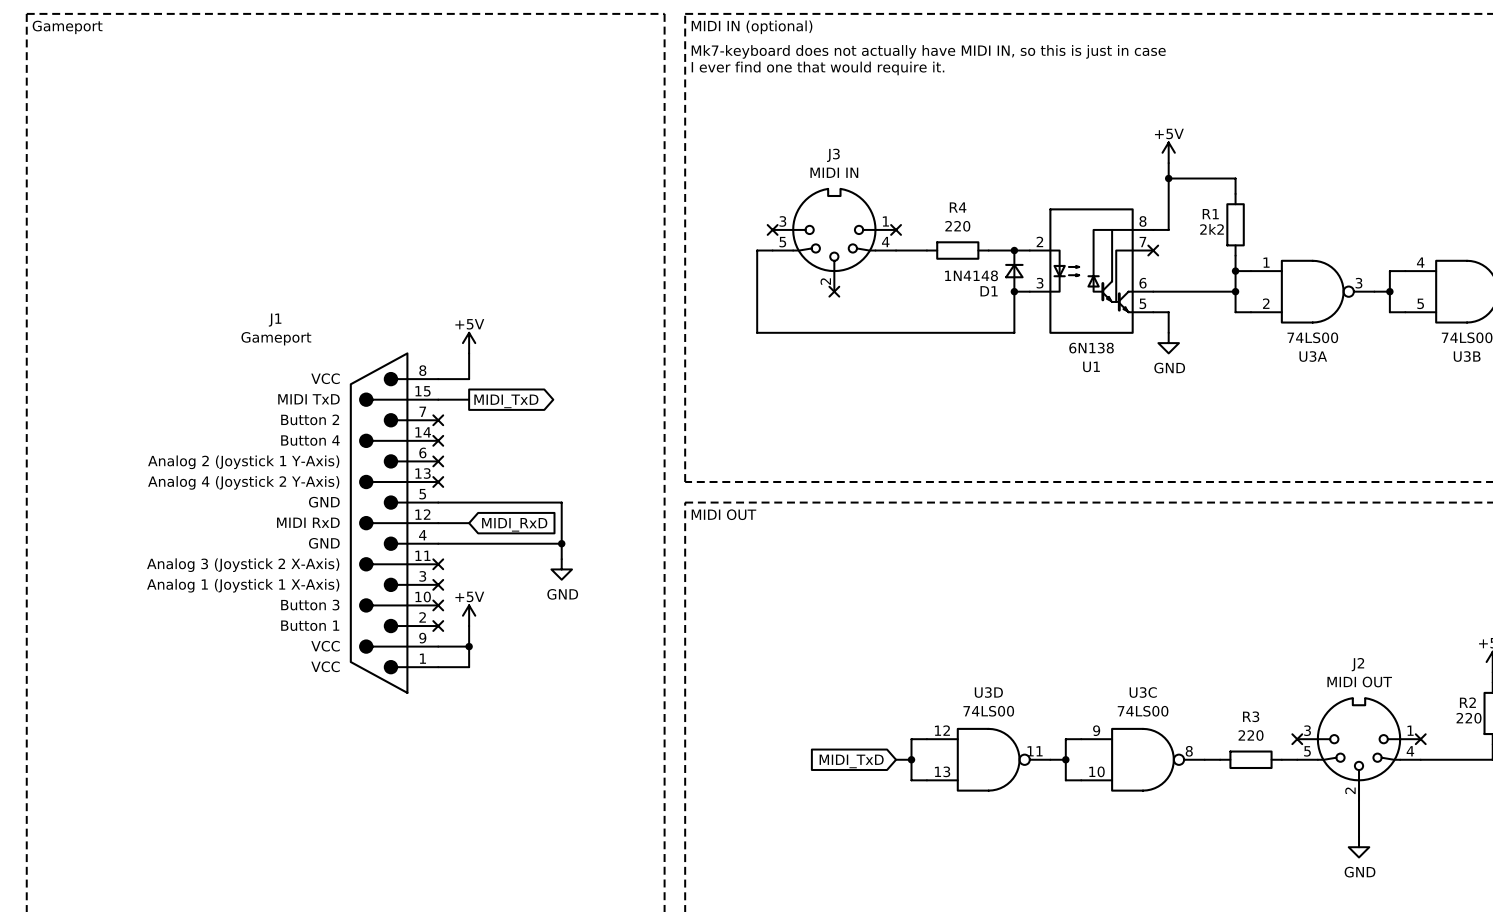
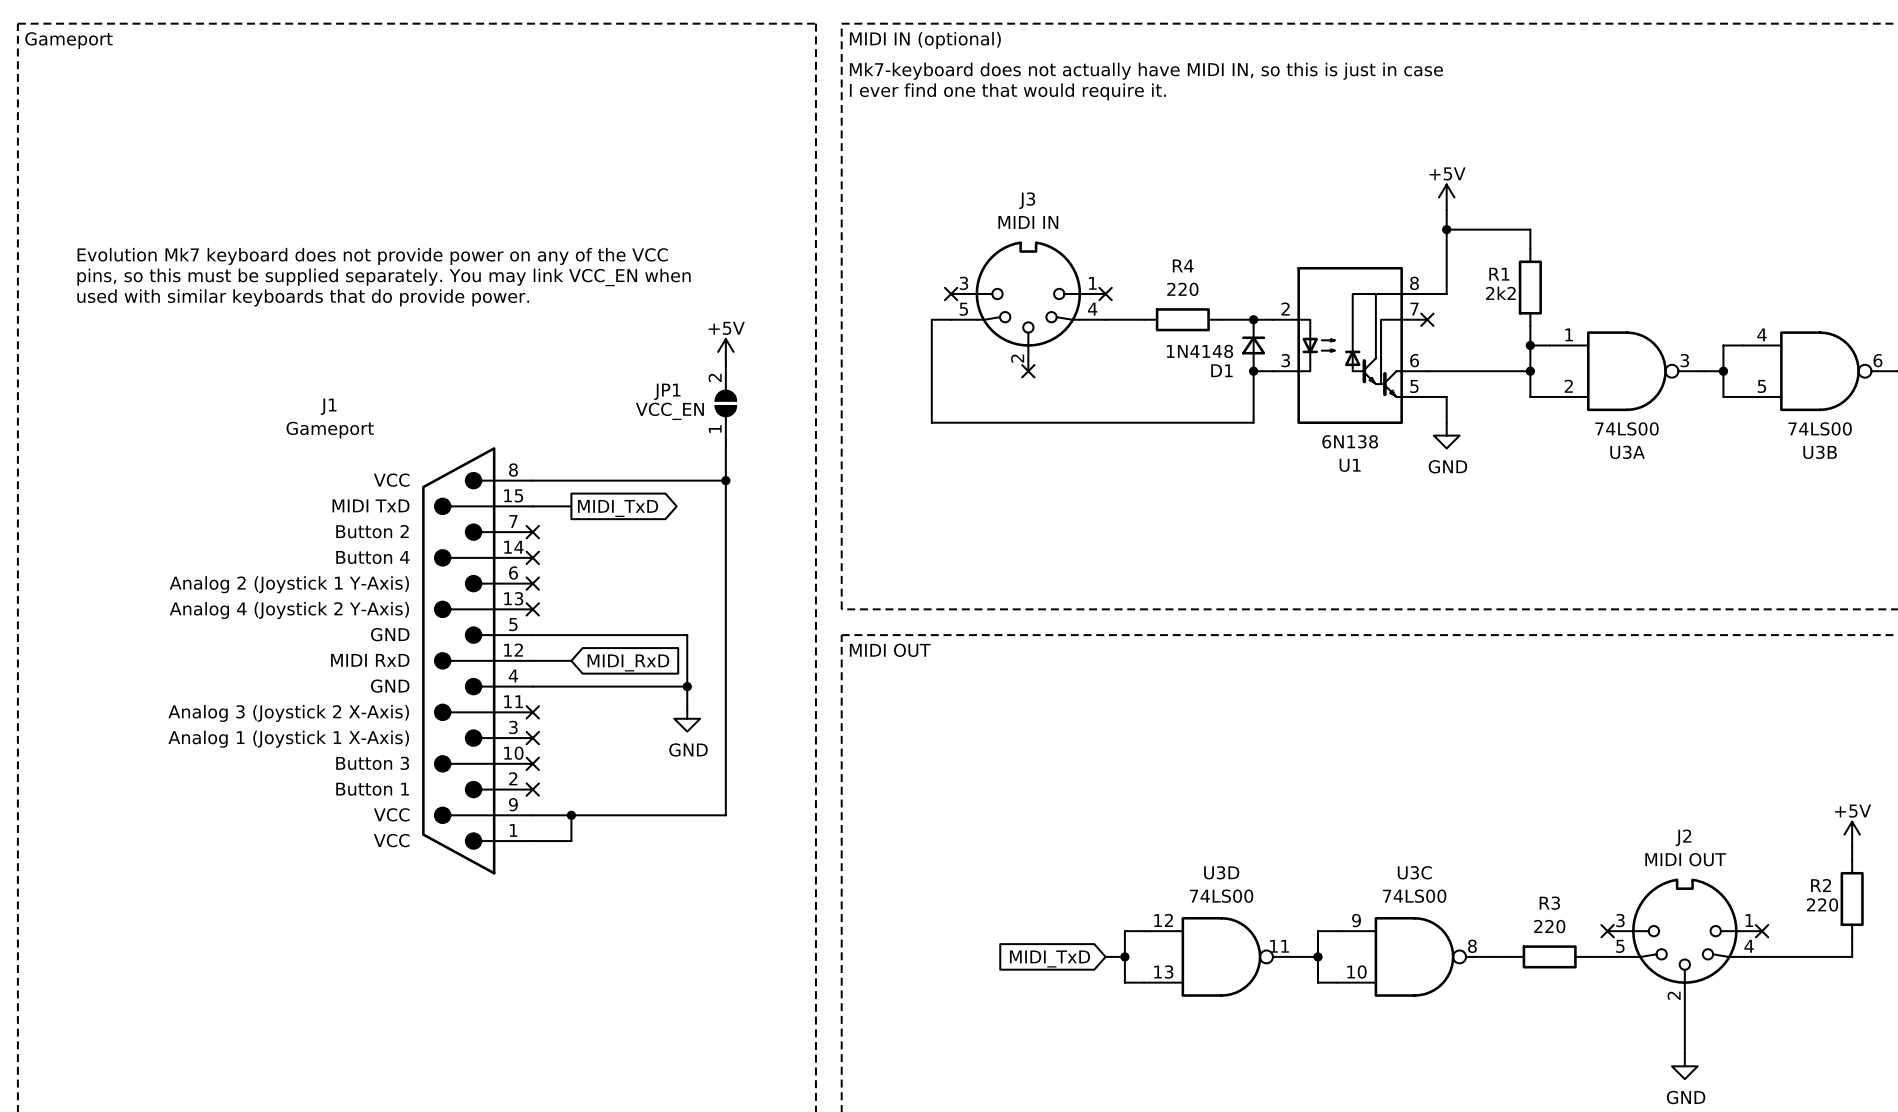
text: none -> Evolution Mk7 keyboard does not provide power on any of the VCC (372, 256)
text: none -> pins, so this must be supplied separately. You may link VCC_EN when (384, 277)
text: none -> used with similar keyboards that do provide power. (303, 297)
JP1: none -> VCC_EN (725, 403)
power symbol position: +5V (469, 343) -> +5V (725, 351)
wire: (469, 353) (469, 379) -> (725, 480) (571, 480)
junction: none -> (725, 480)
power symbol: +5V (469, 615) -> none
wire: (469, 626) (469, 646) -> (725, 442) (725, 815) (571, 815)

